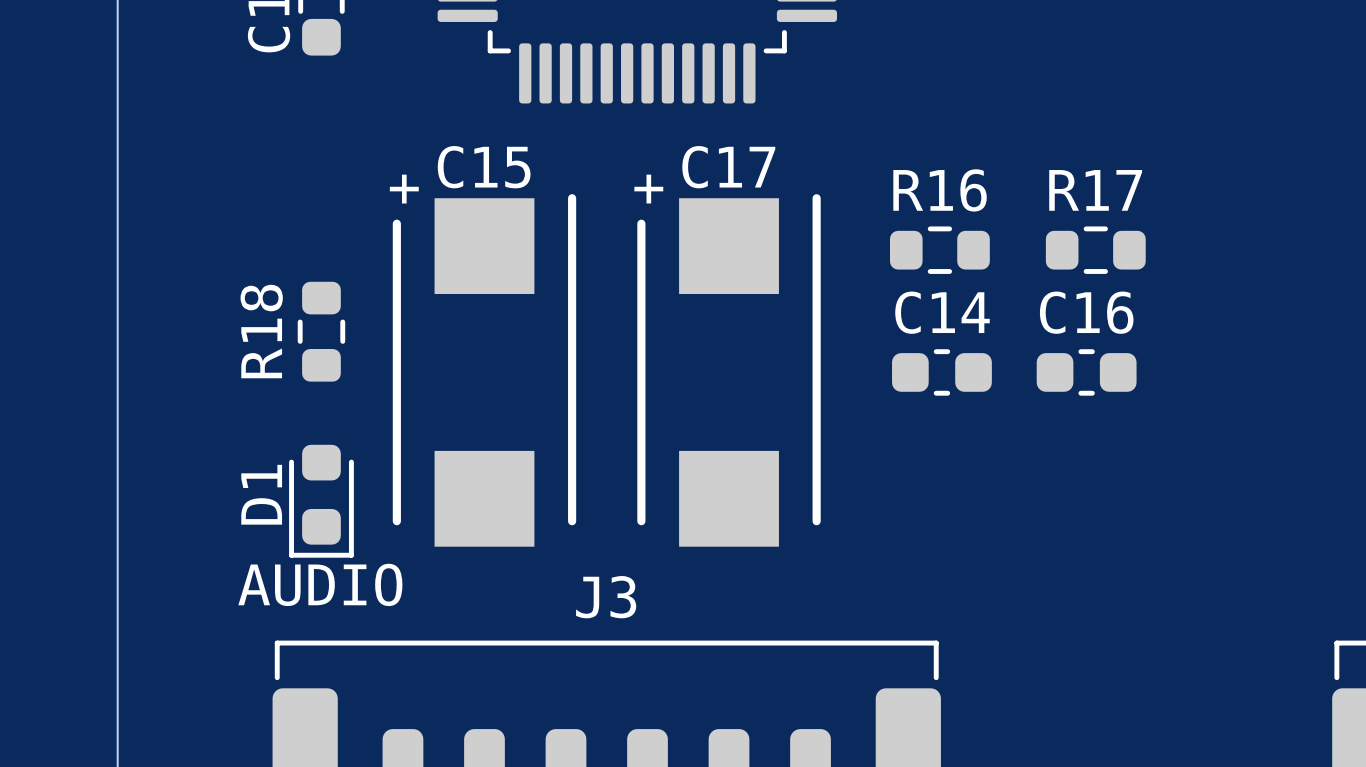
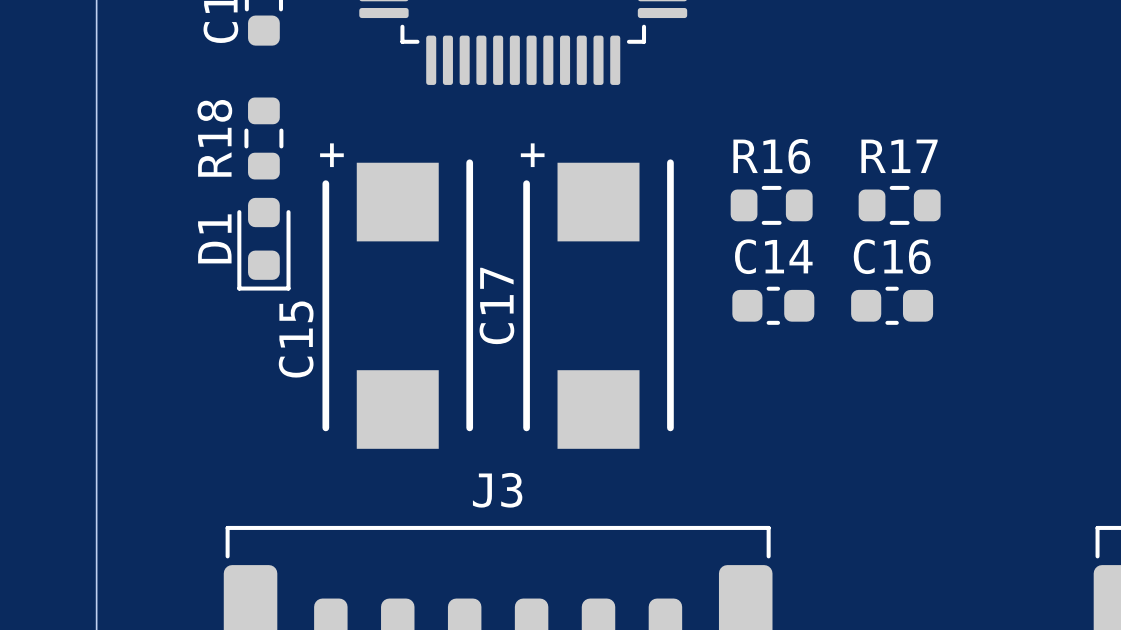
C15 name rotation: 0° (484, 167) -> 90° counterclockwise (296, 339)
C15 name position: C15 (484, 167) -> C15 (296, 339)
C17 name rotation: 0° (728, 167) -> 90° counterclockwise (496, 305)
C17 name position: C17 (728, 167) -> C17 (496, 305)
R18 position: (321, 331) -> (263, 138)
D1 position: (321, 501) -> (263, 244)
D1 value: AUDIO (320, 584) -> none

